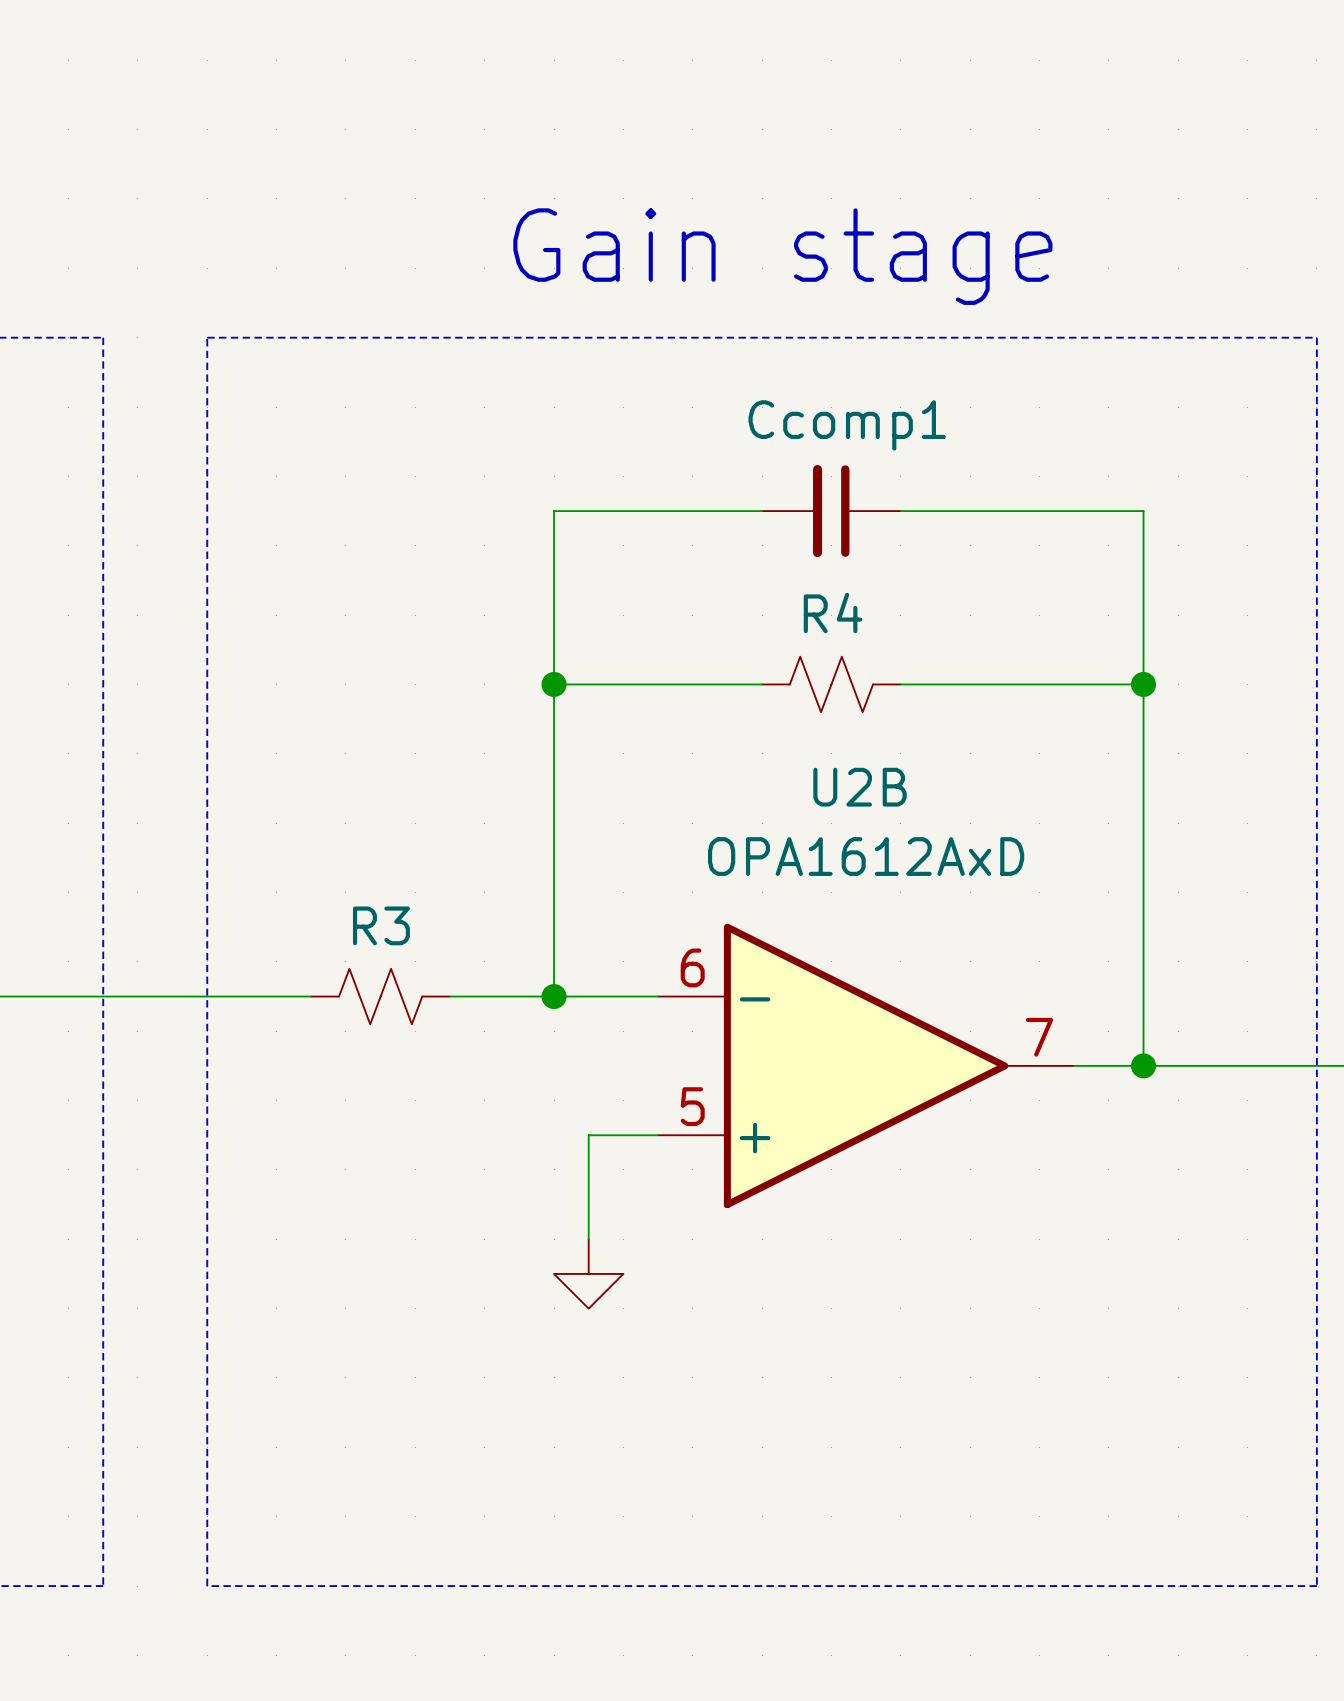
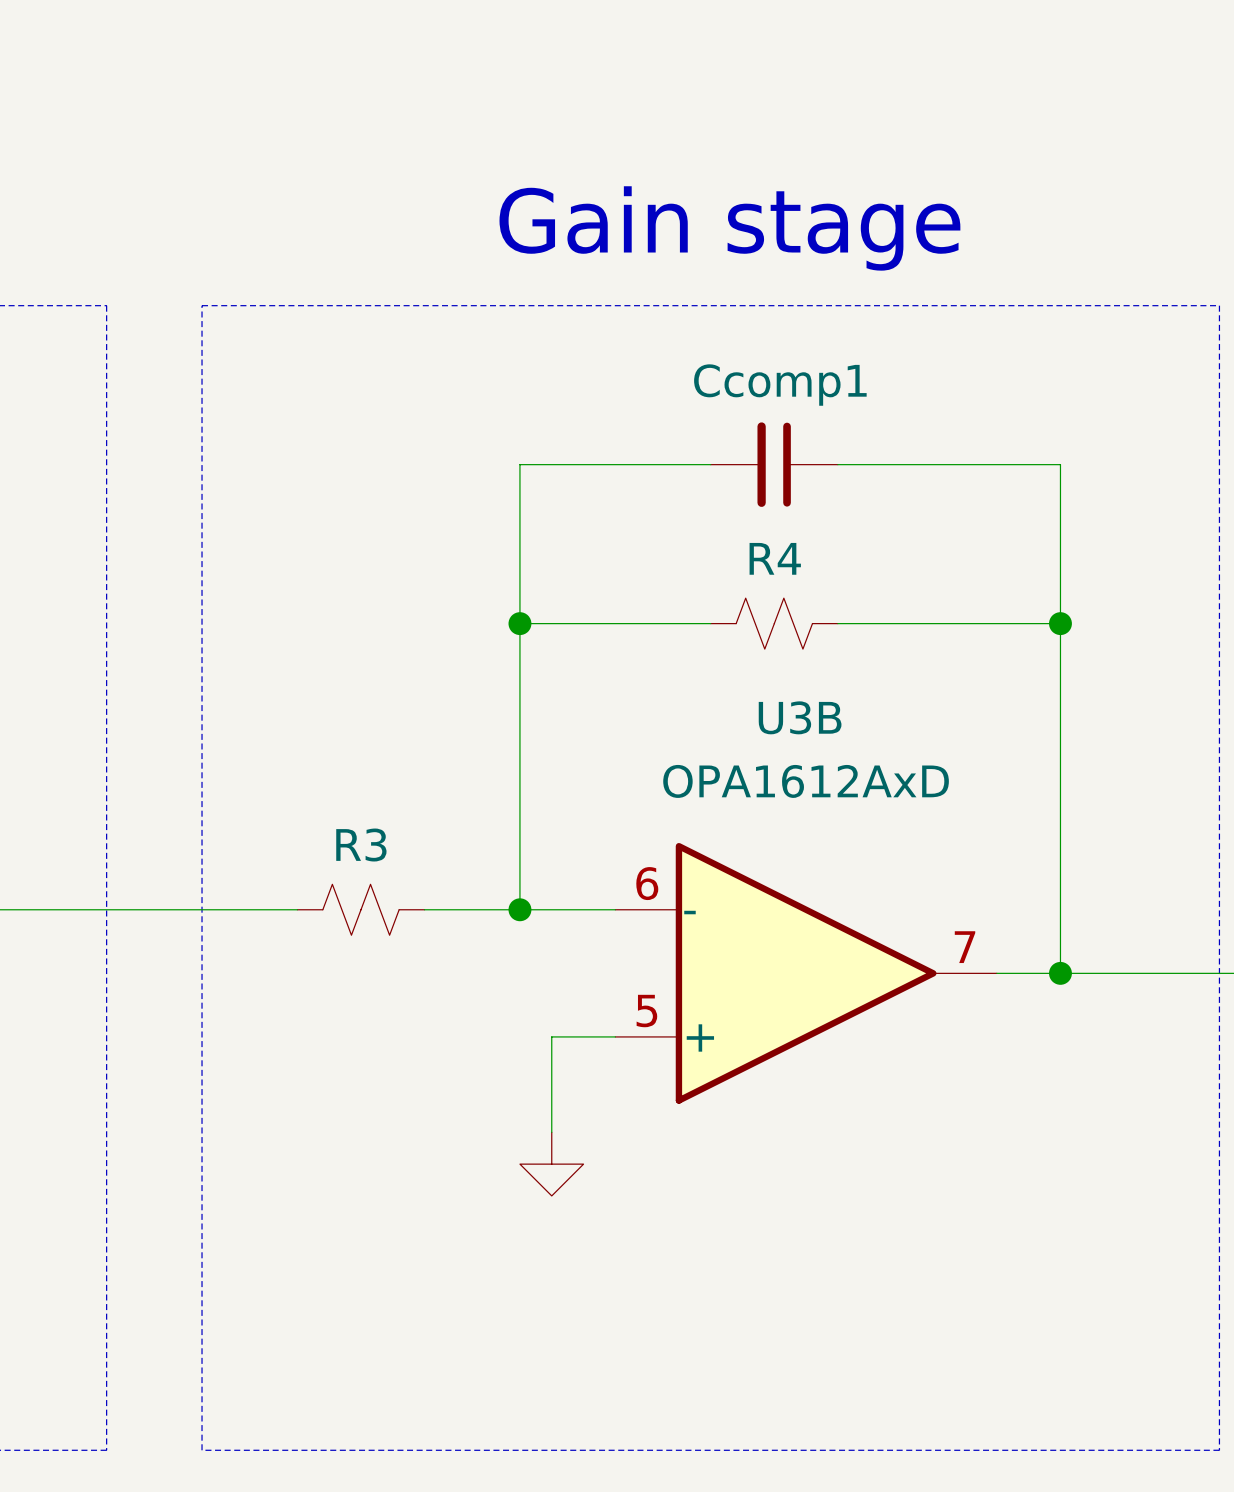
U2B name: U2B (859, 787) -> U3B (800, 717)

